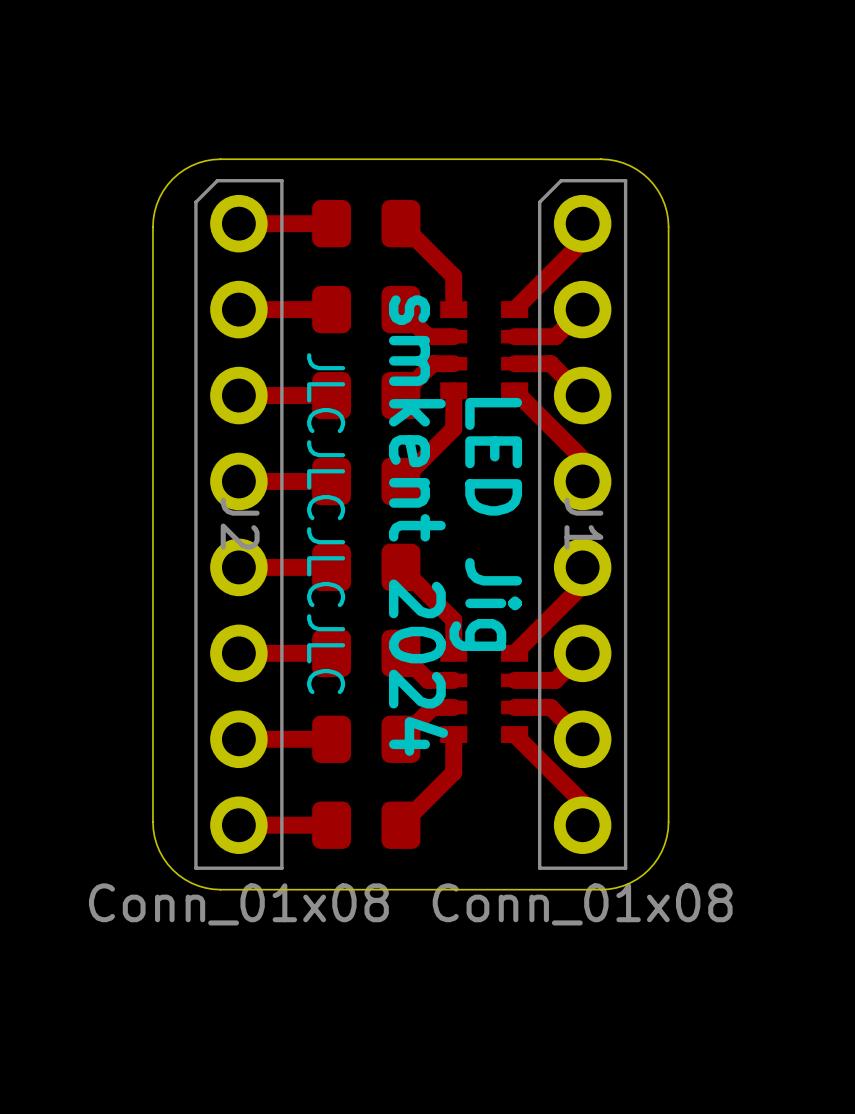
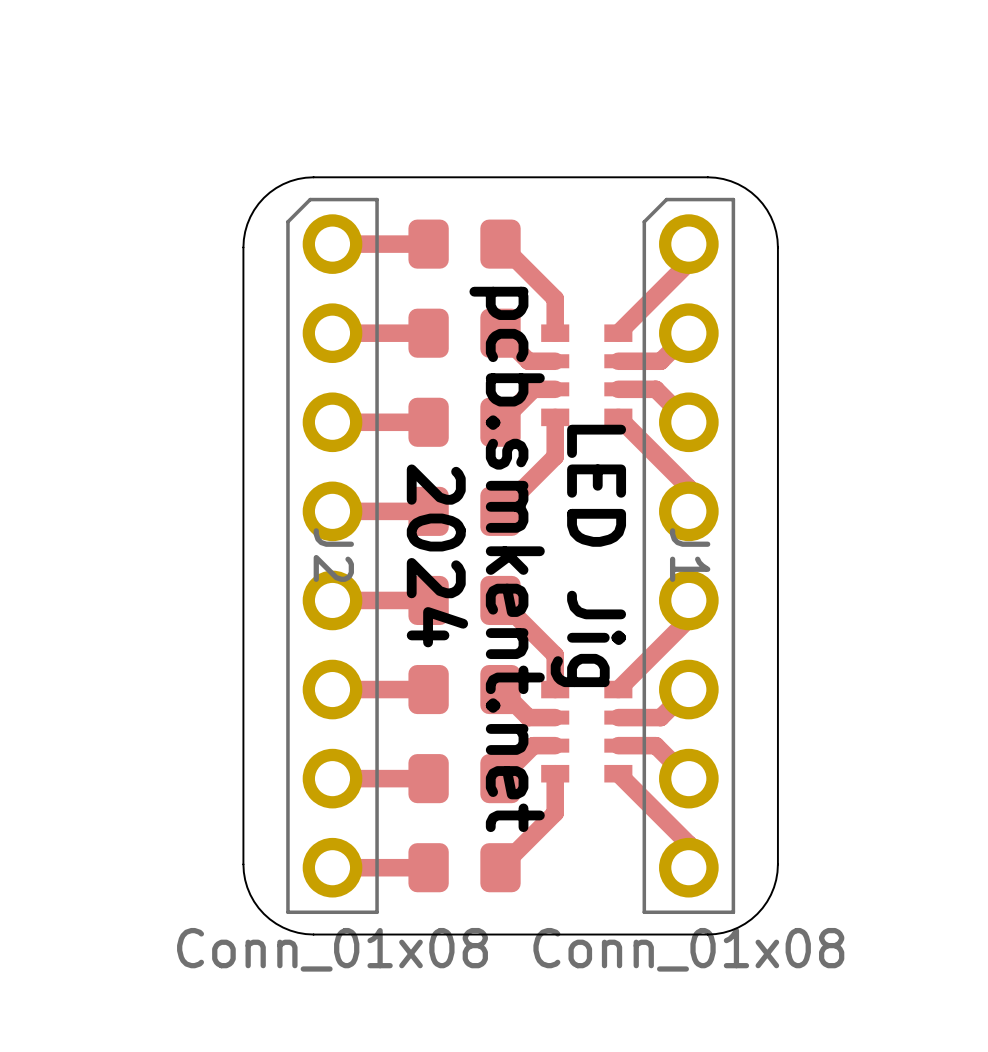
text: JLCJLCJLCJLC (326, 523) -> 2024 (437, 555)
text: smkent 2024 (418, 525) -> pcb.smkent.net (507, 559)

